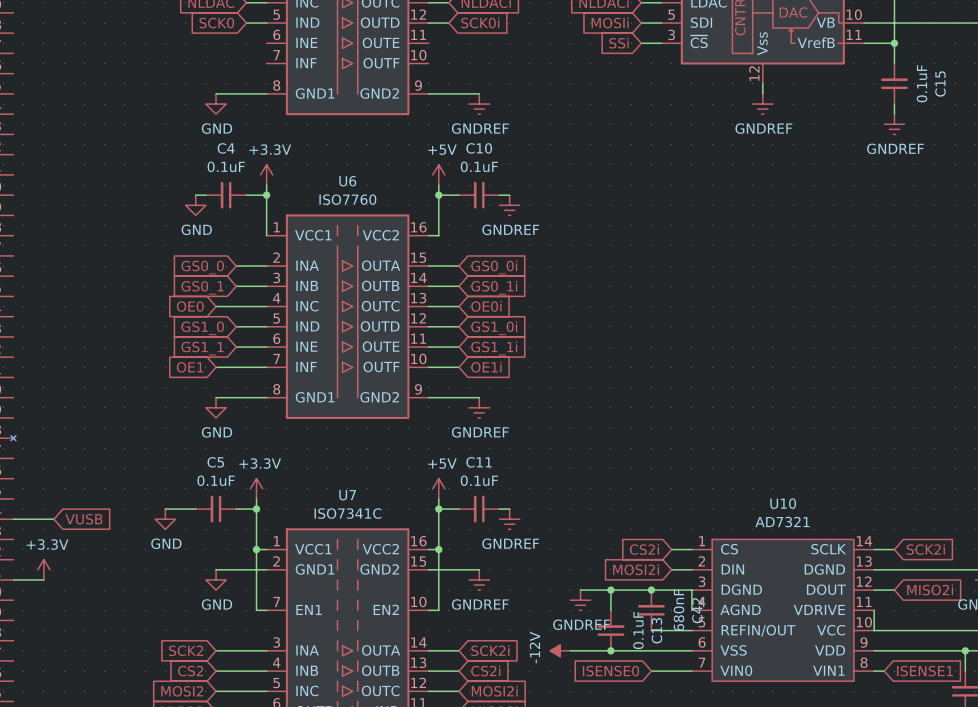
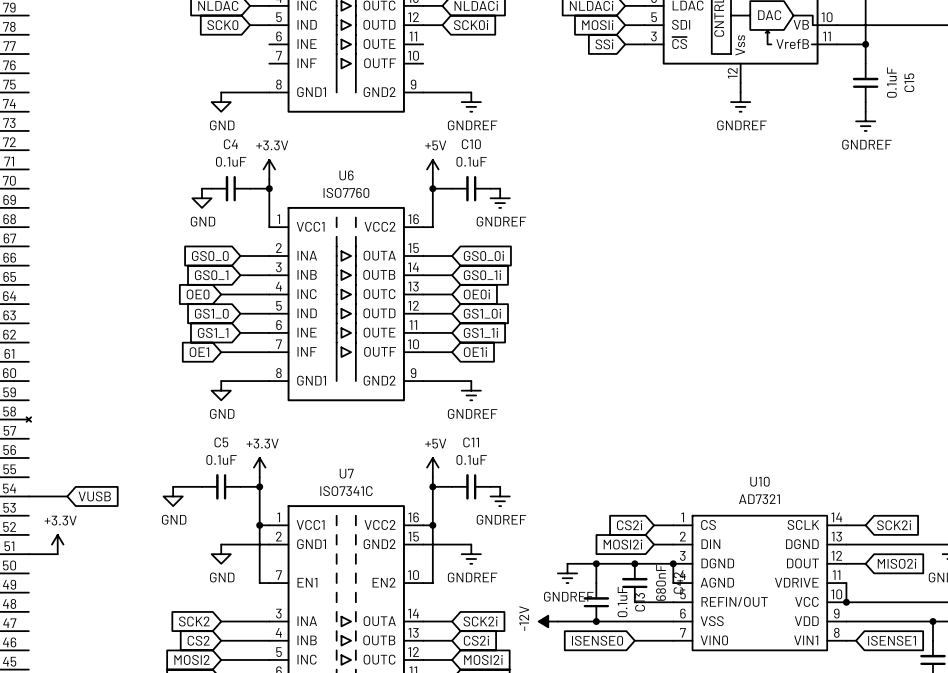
junction: none -> (673, 563)
junction: none -> (846, 602)

